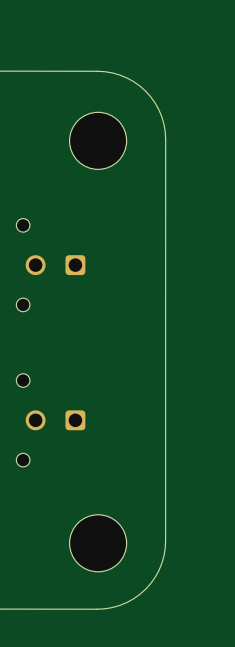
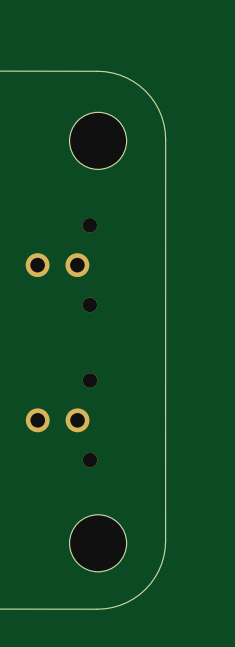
part footprint: [16, 218, 86, 312] -> [25, 218, 98, 313]
part footprint: [16, 373, 86, 467] -> [25, 373, 98, 468]

